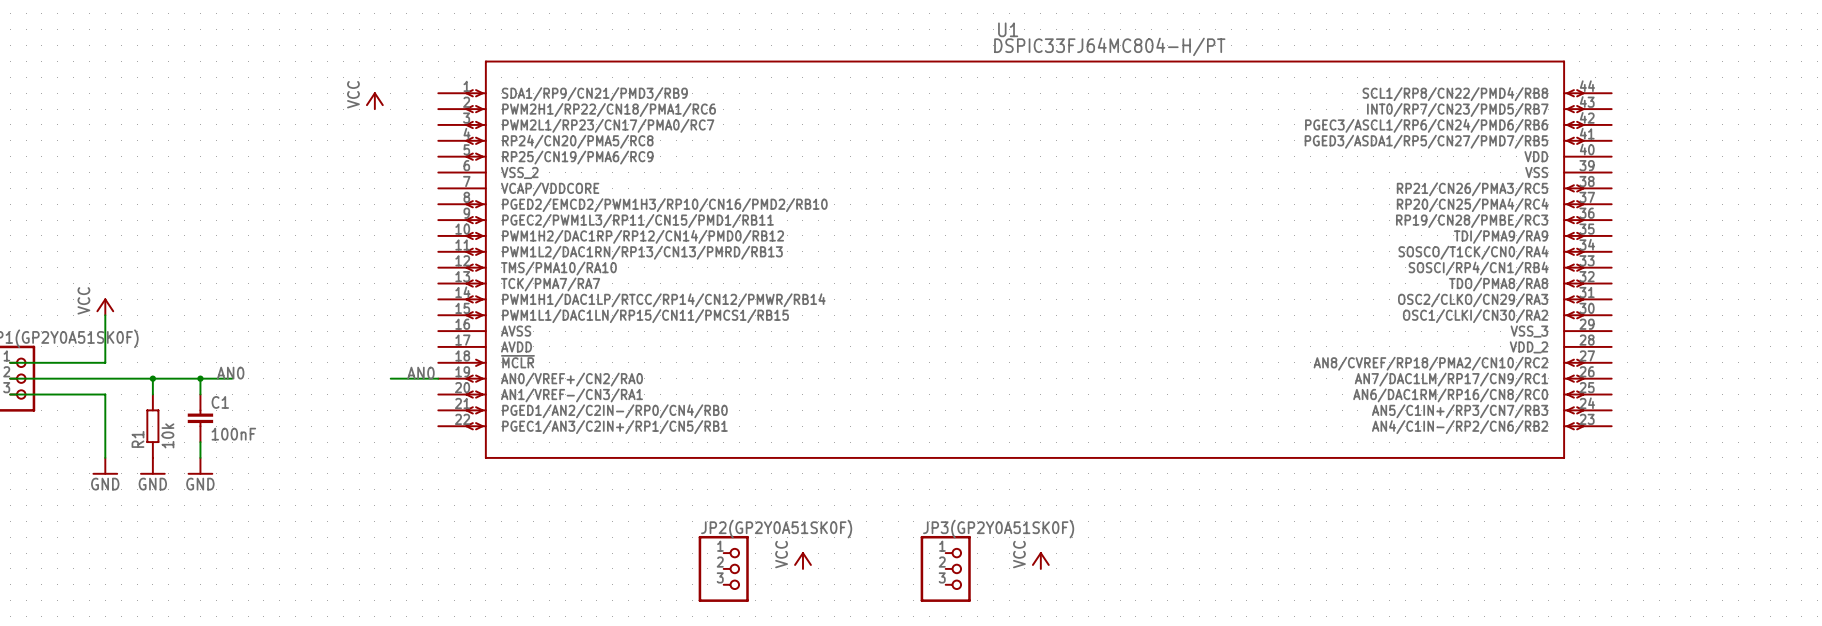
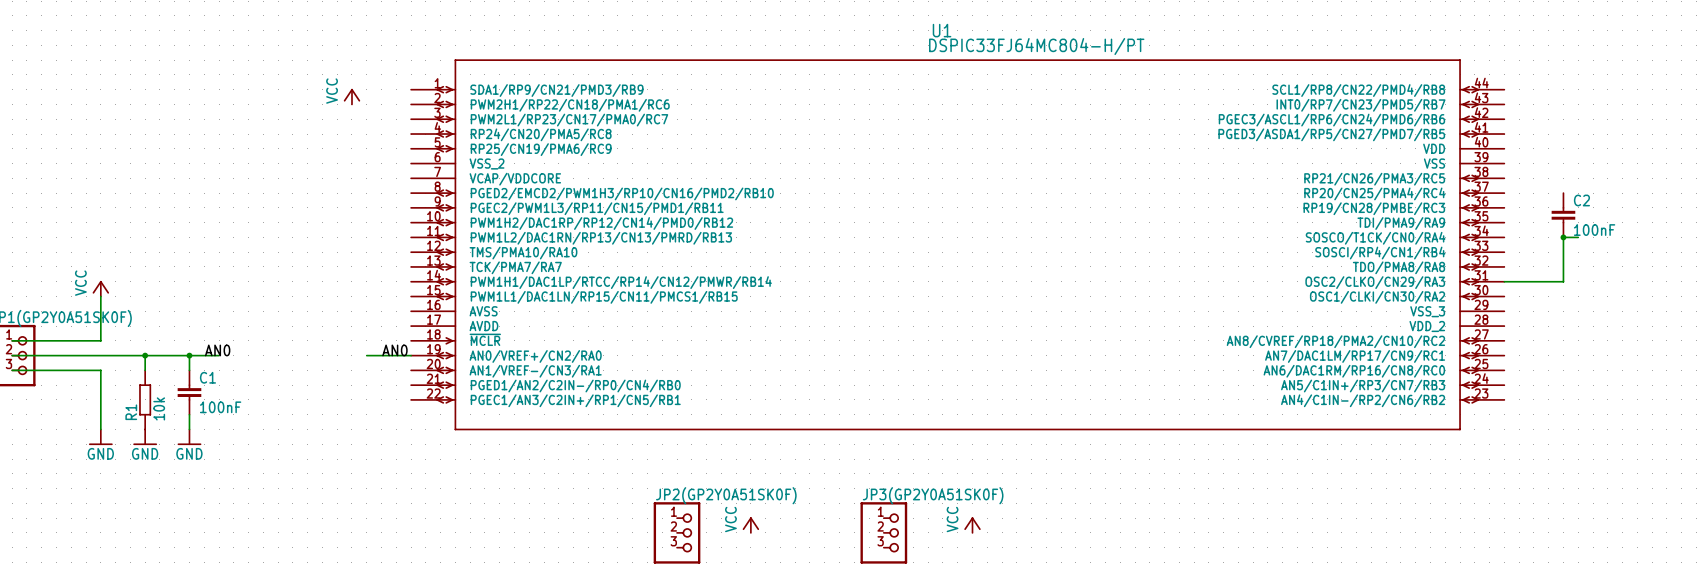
C2: none -> 100nF (1563, 215)
junction: none -> (1563, 237)
wire: none -> (1578, 237) (1563, 237) (1563, 281) (1504, 281)

